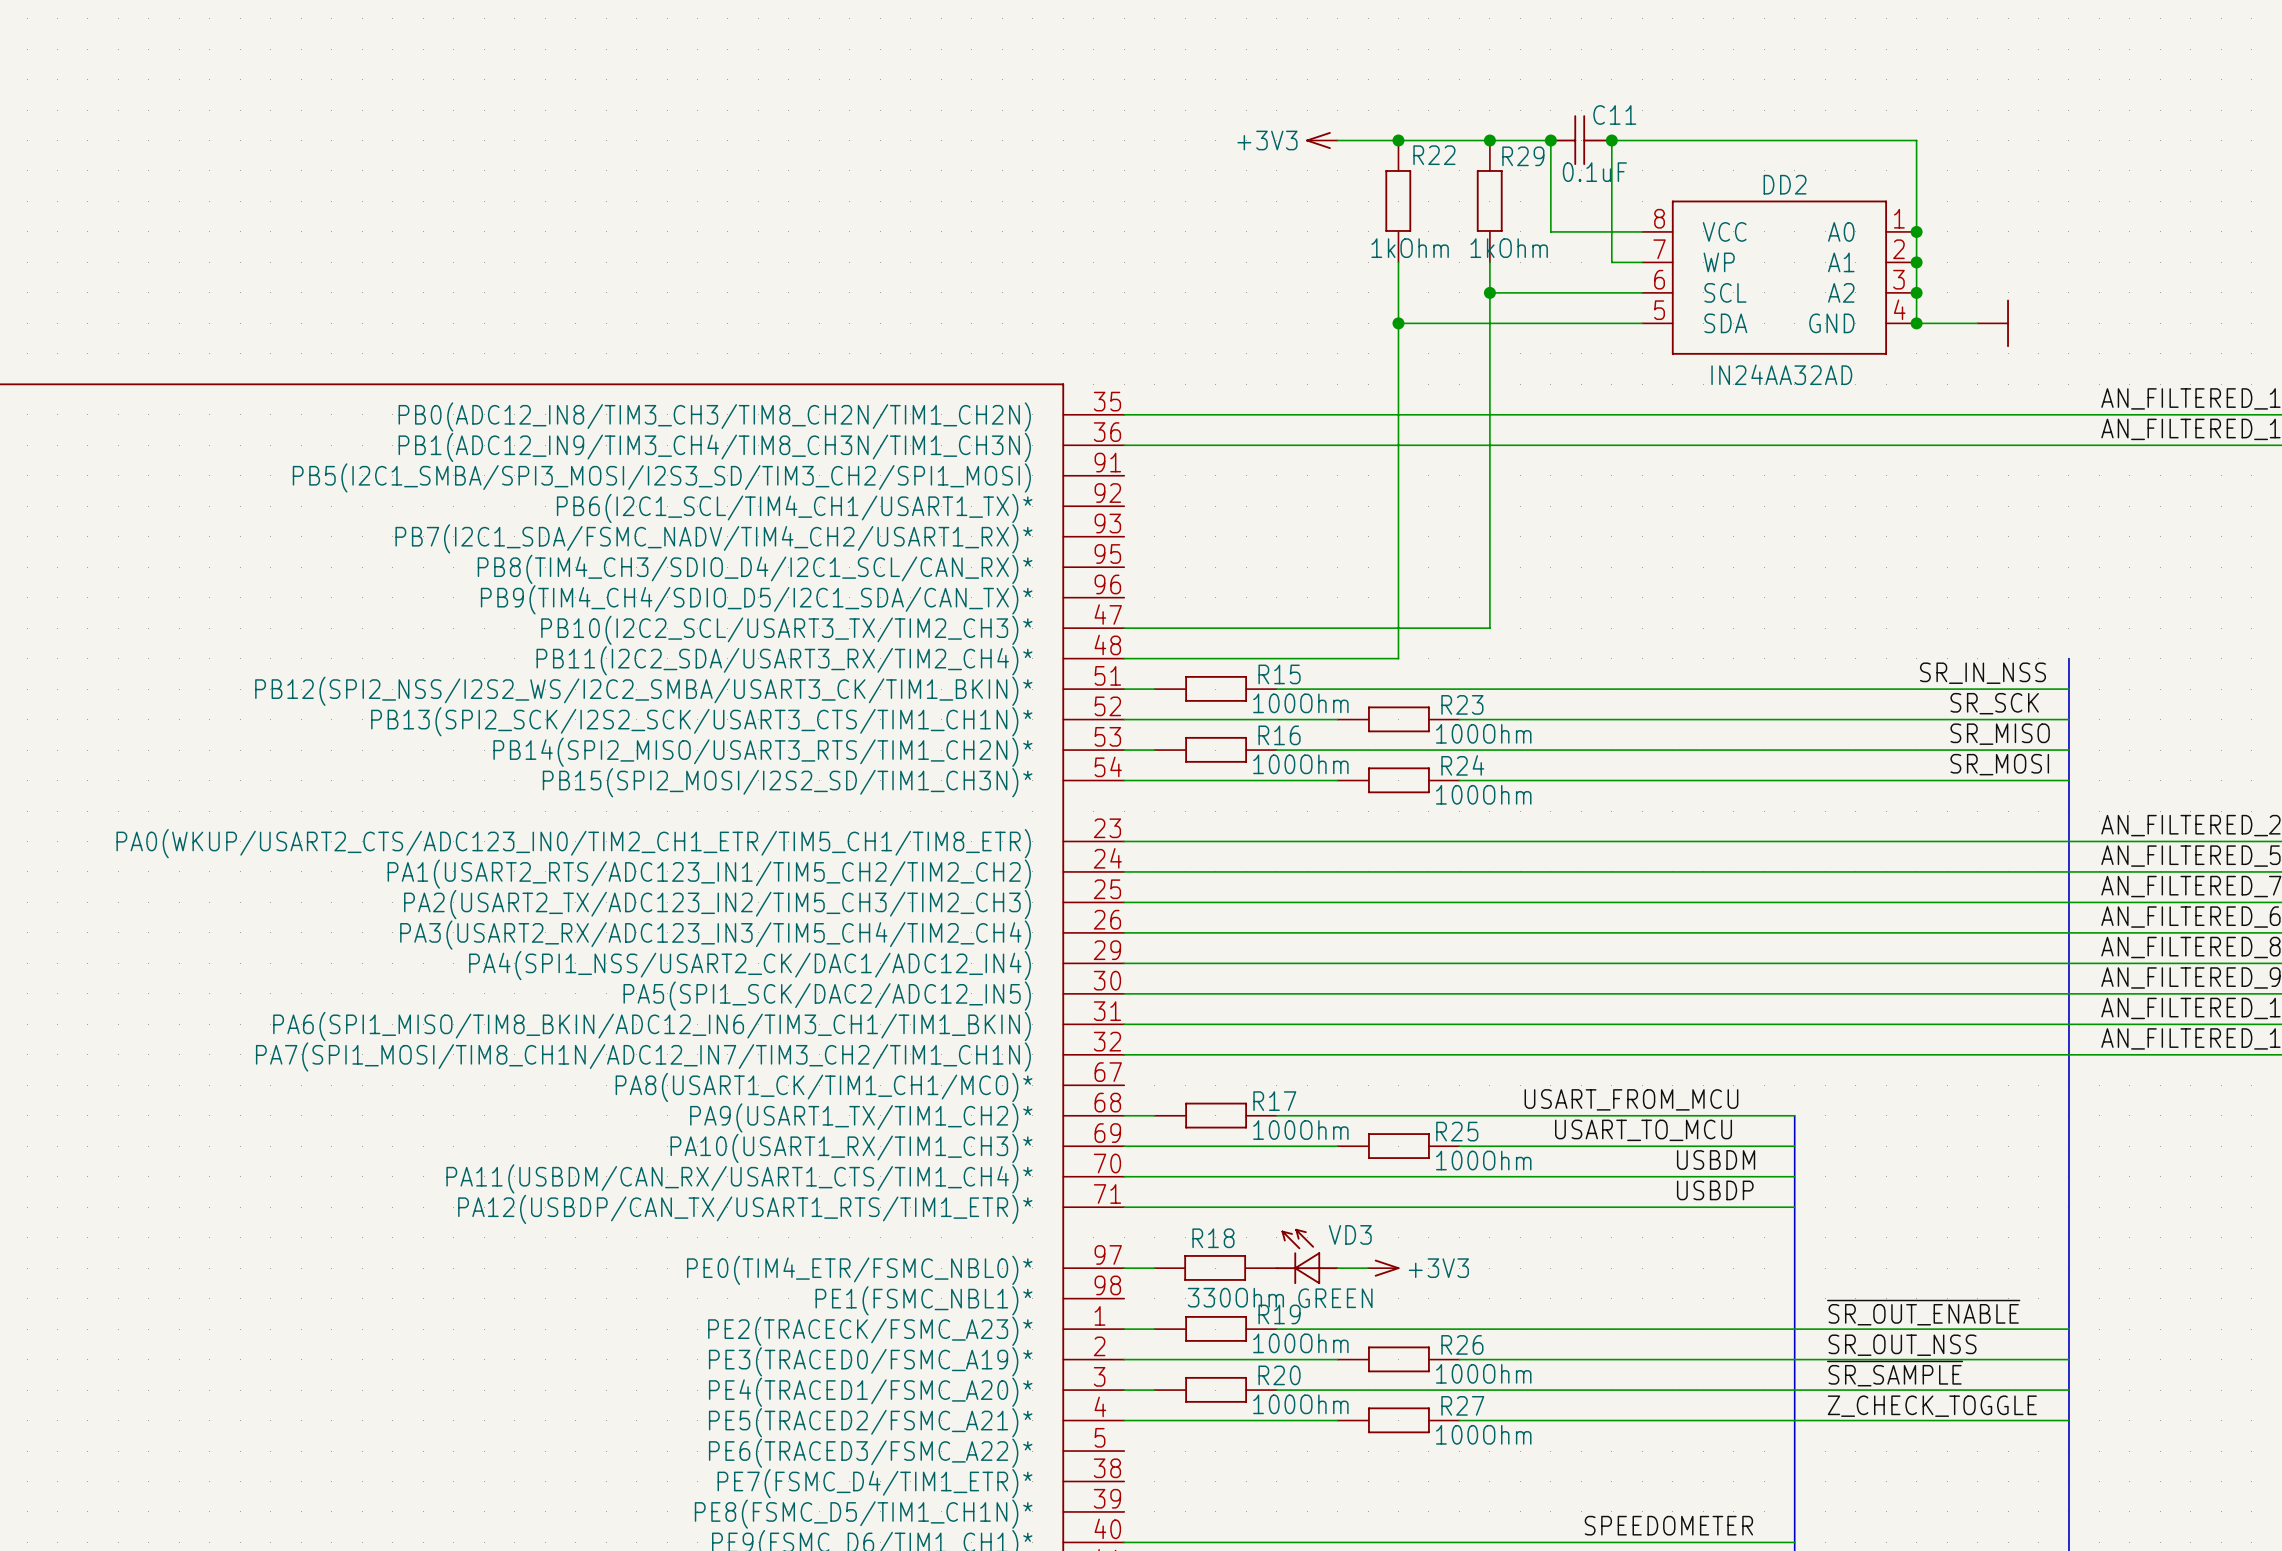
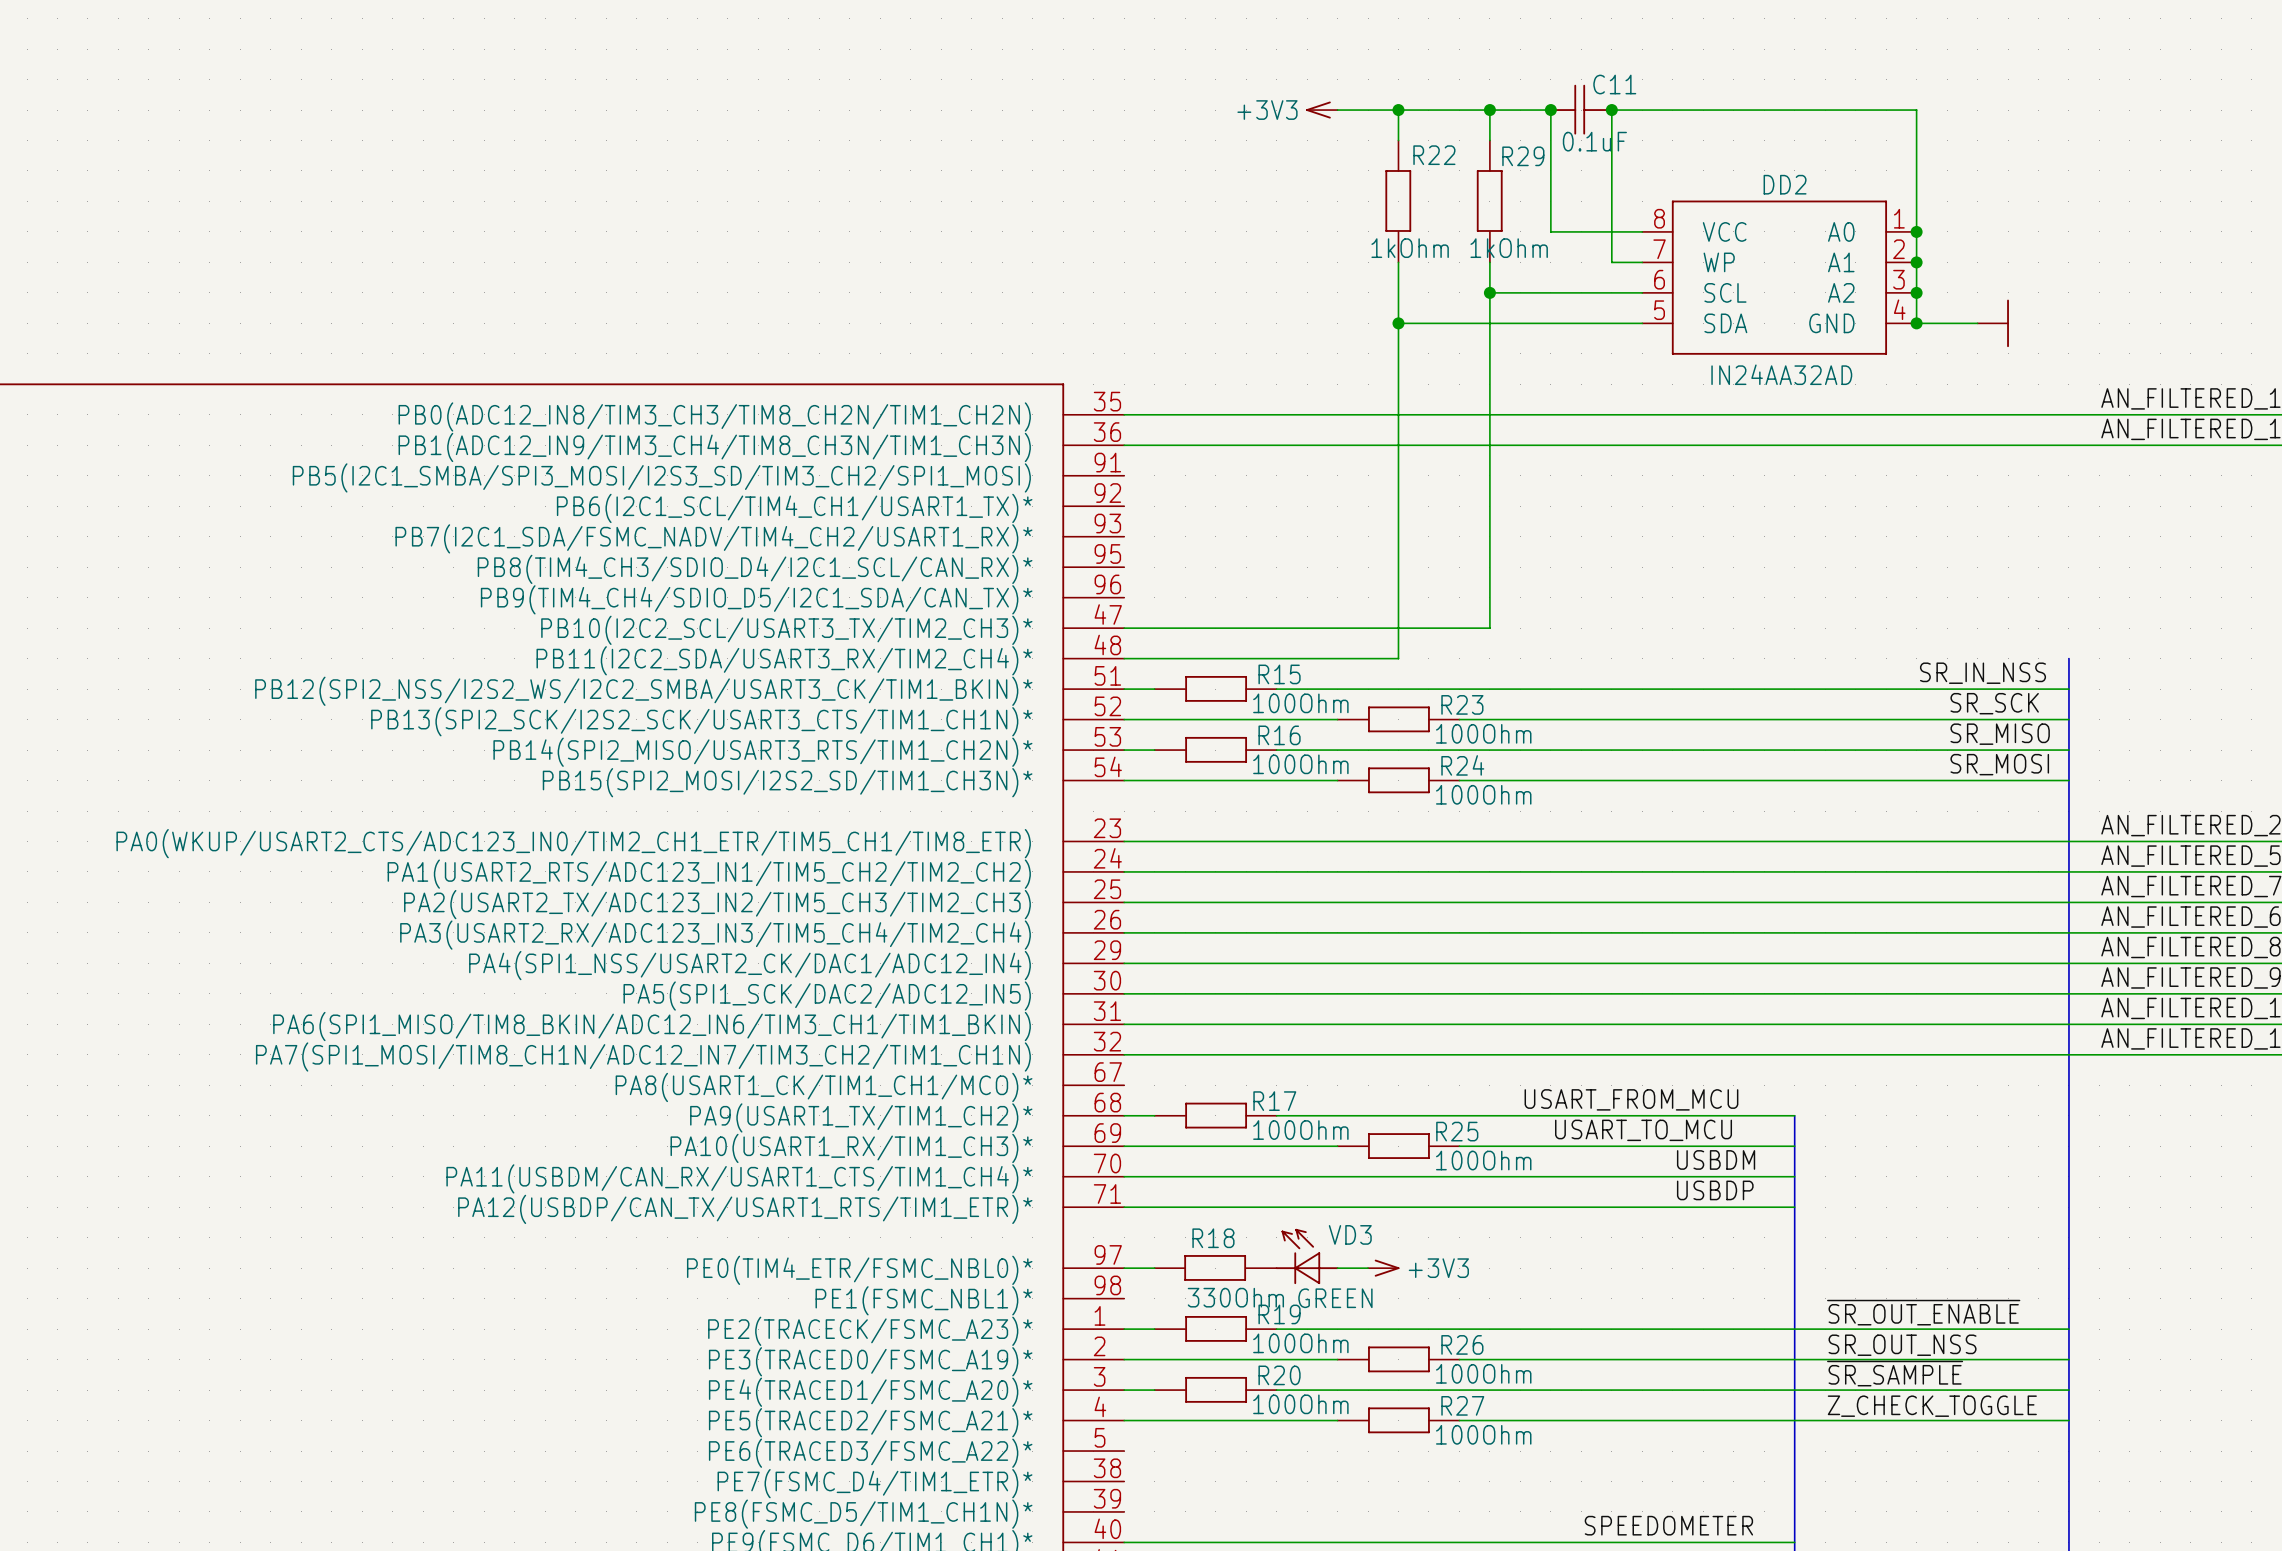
wire: none -> (1398, 110) (1398, 140)
wire: none -> (1489, 110) (1489, 140)
power symbol position: +3V3 (1321, 140) -> +3V3 (1321, 110)
wire: (1337, 140) (1550, 140) -> (1337, 110) (1550, 110) (1550, 140)
junction position: (1398, 140) -> (1398, 110)
junction position: (1489, 140) -> (1489, 110)
junction position: (1550, 140) -> (1550, 110)
C11 position: (1581, 140) -> (1581, 109)
wire: (1611, 140) (1916, 140) -> (1611, 140) (1611, 110) (1916, 110) (1916, 140)
junction position: (1611, 140) -> (1611, 110)

